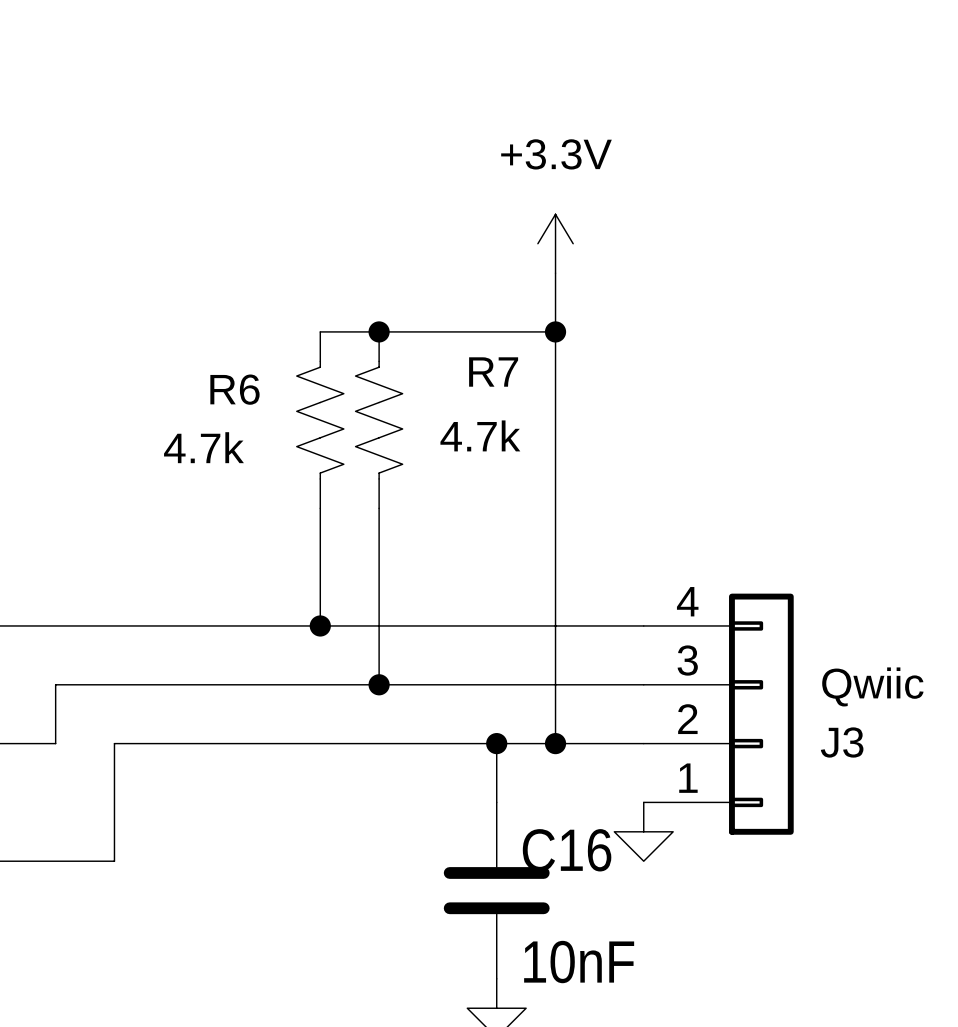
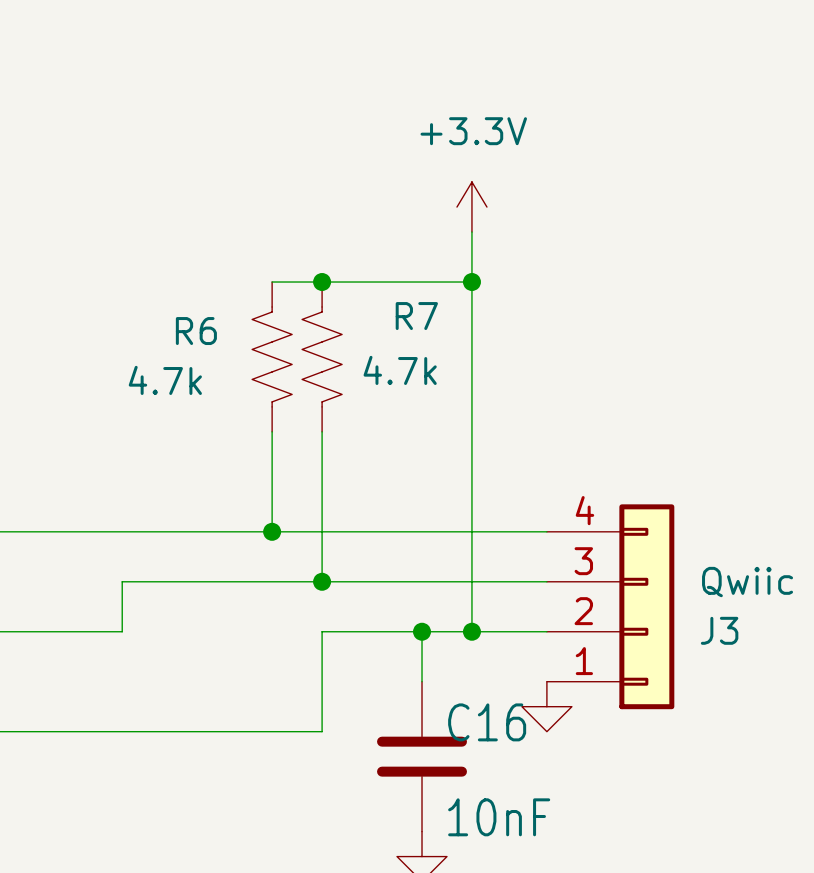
wire: (143, 684) (55, 684) (55, 743) -> (97, 631) (47, 631)
wire: none -> (122, 581) (122, 631)
wire: (114, 743) (114, 861) -> none
wire: (143, 743) (379, 743) -> (97, 731) (322, 731) (322, 631)

